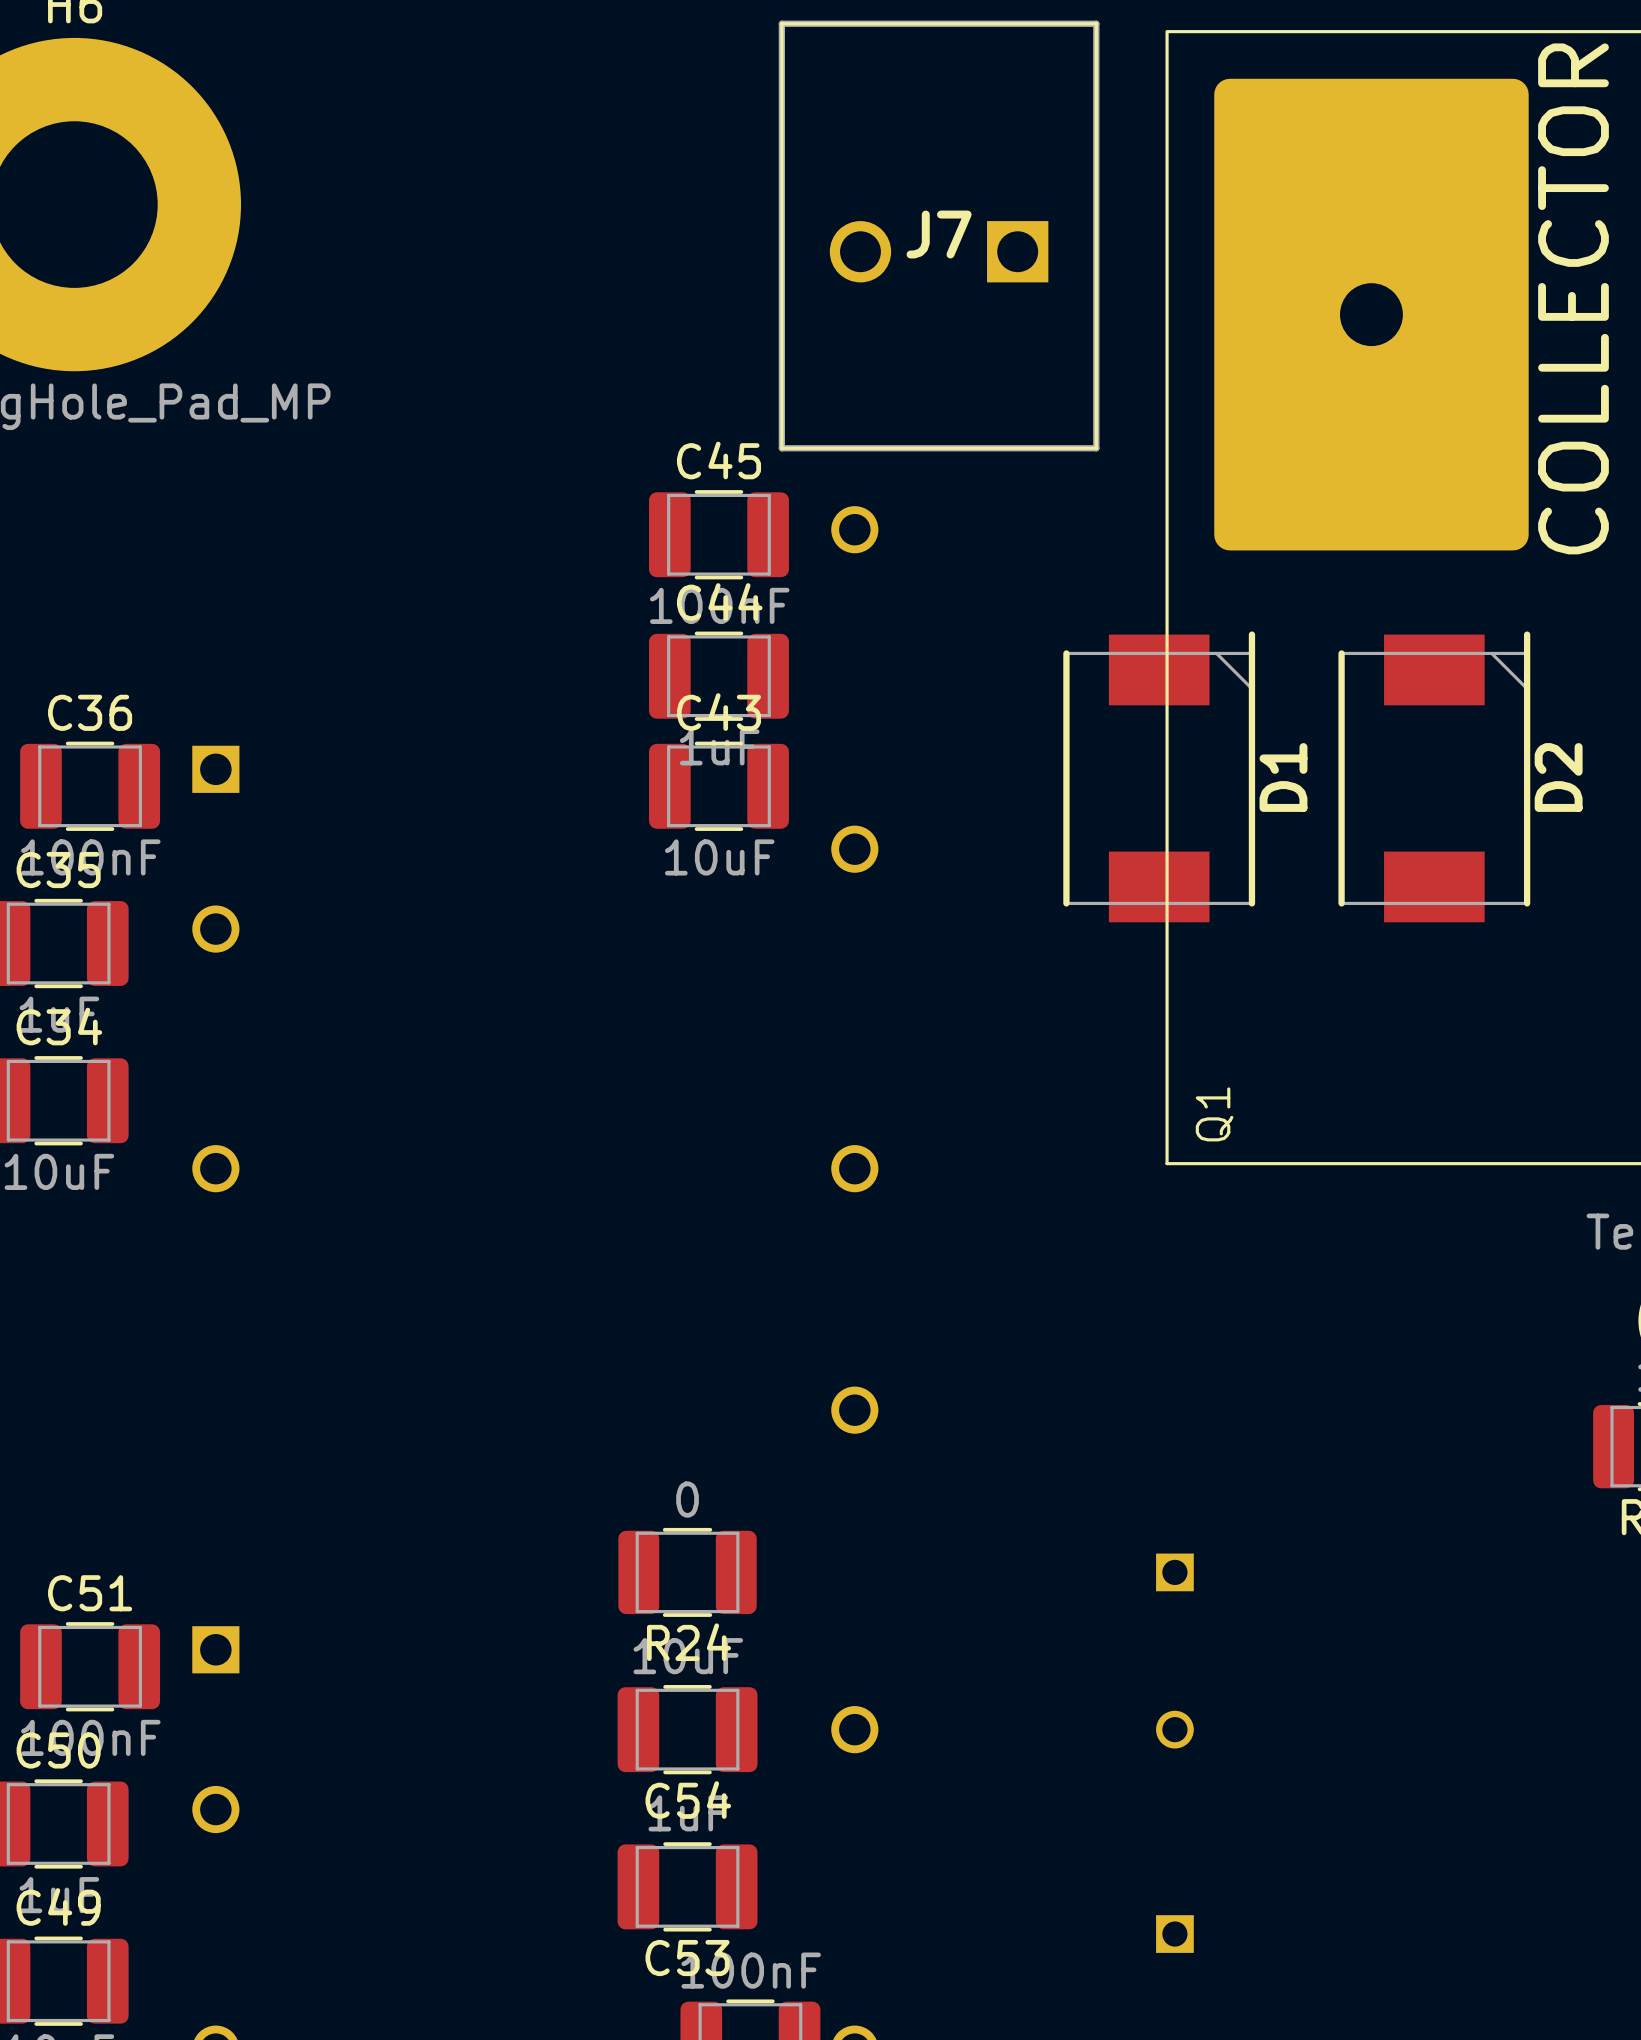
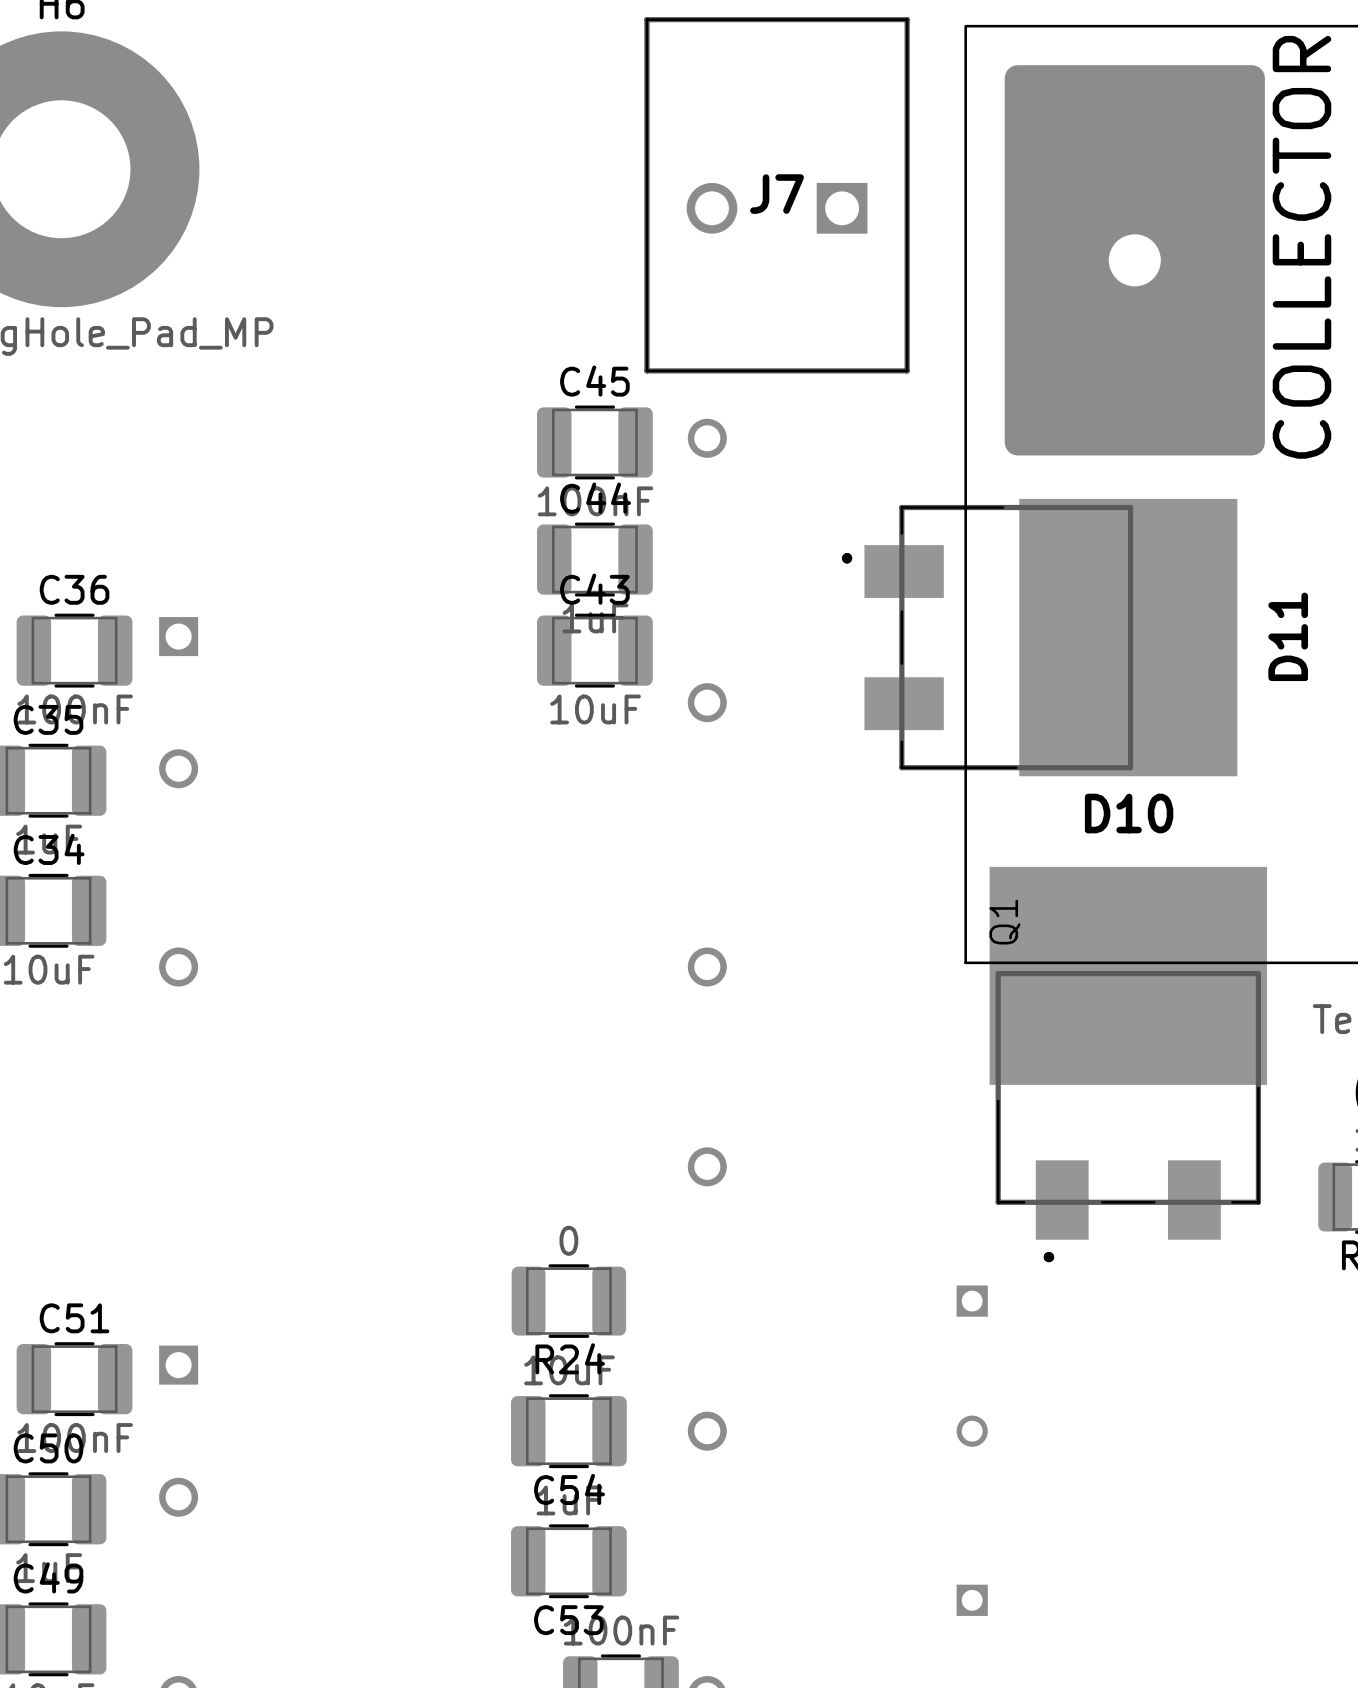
D11: none -> (1039, 637)
D1: (1159, 776) -> none
D2: (1434, 776) -> none
D10: none -> (1128, 1064)

